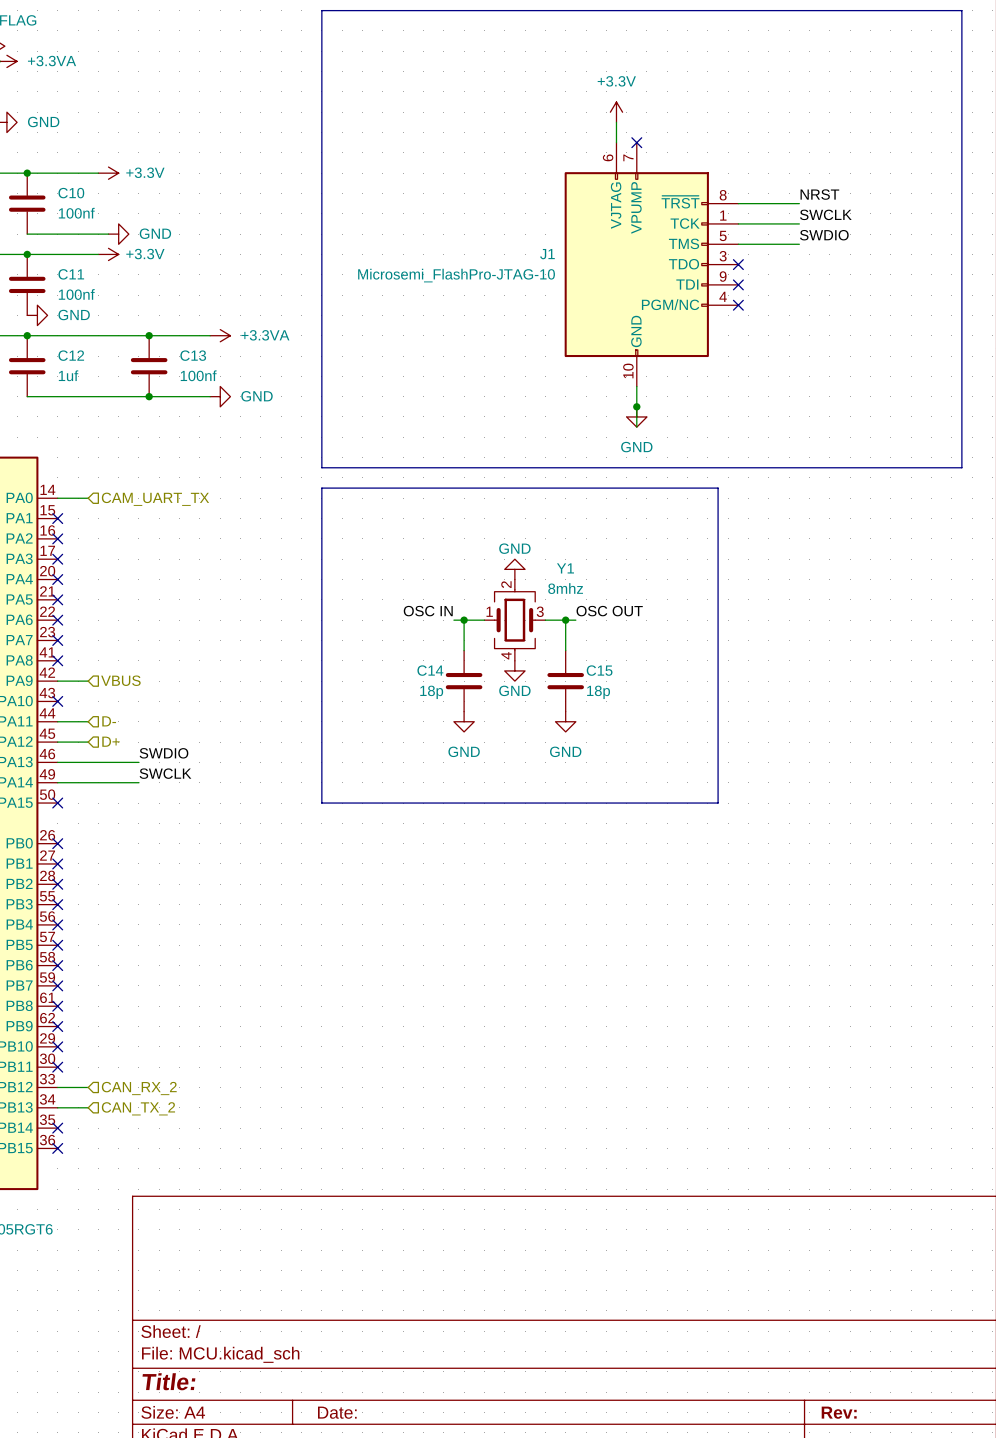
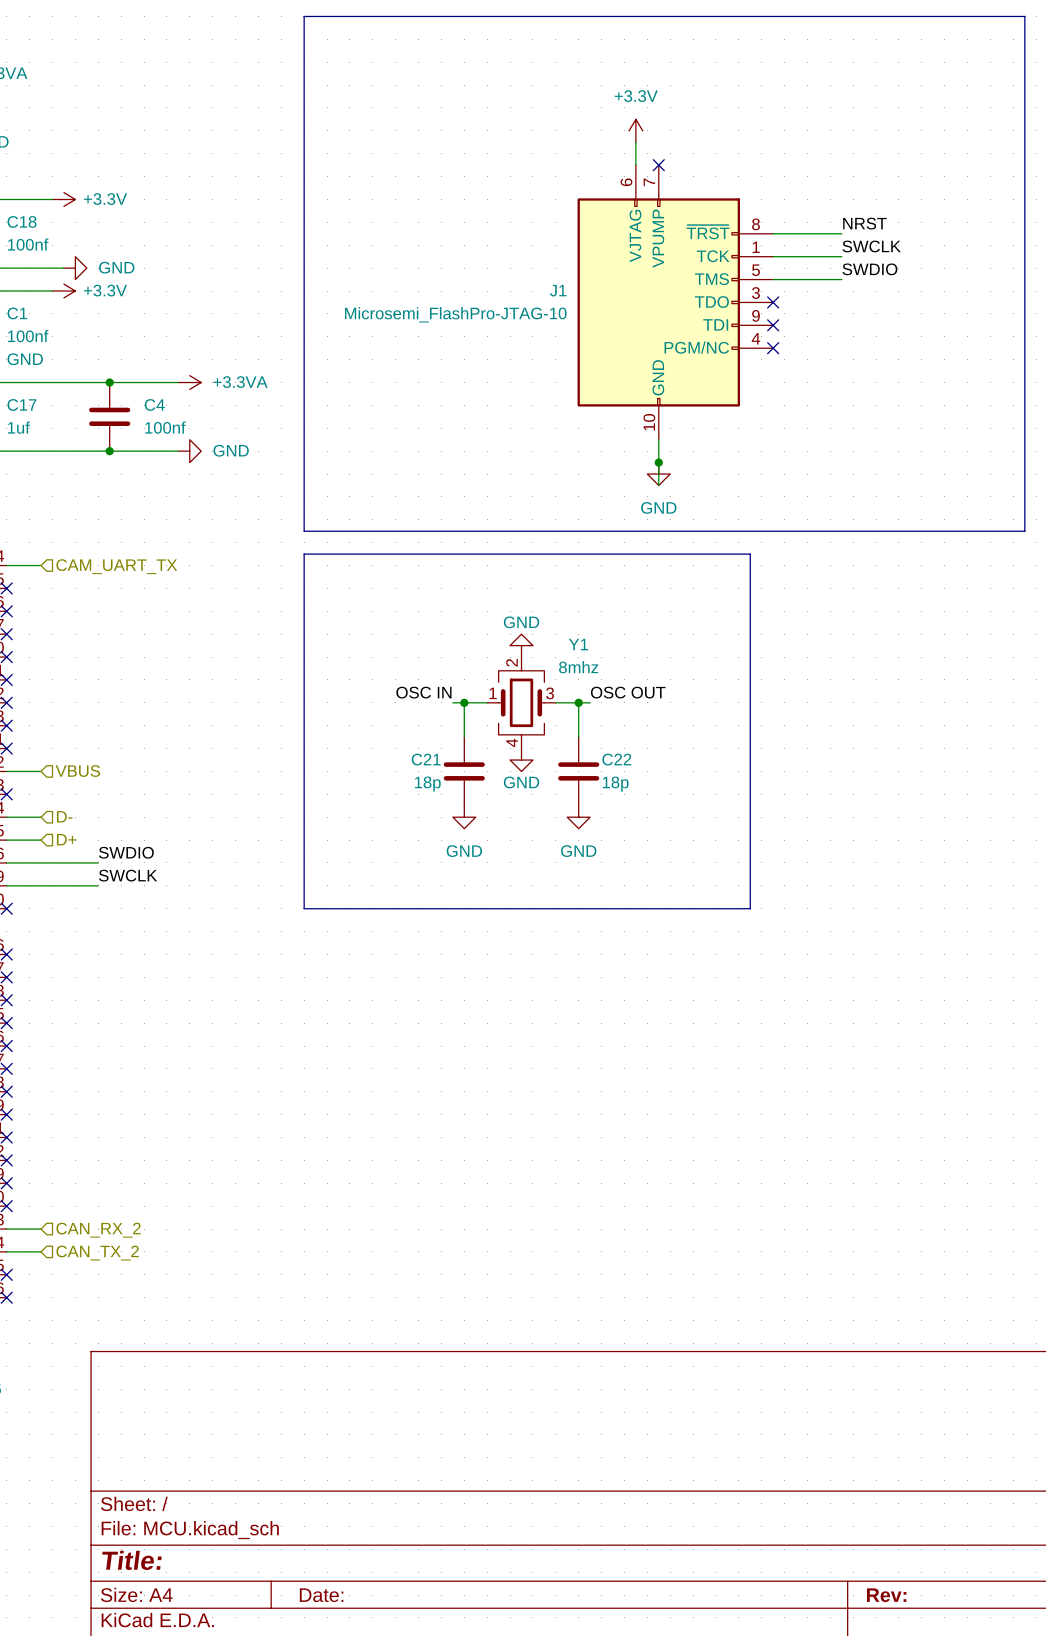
C10 name: C10 (71, 193) -> C18 (22, 221)
C11 name: C11 (71, 274) -> C1 (17, 313)
C12 name: C12 (71, 355) -> C17 (21, 404)
C13 name: C13 (193, 355) -> C4 (154, 404)
C14 name: C14 (430, 670) -> C21 (426, 759)
C15 name: C15 (599, 670) -> C22 (616, 759)

